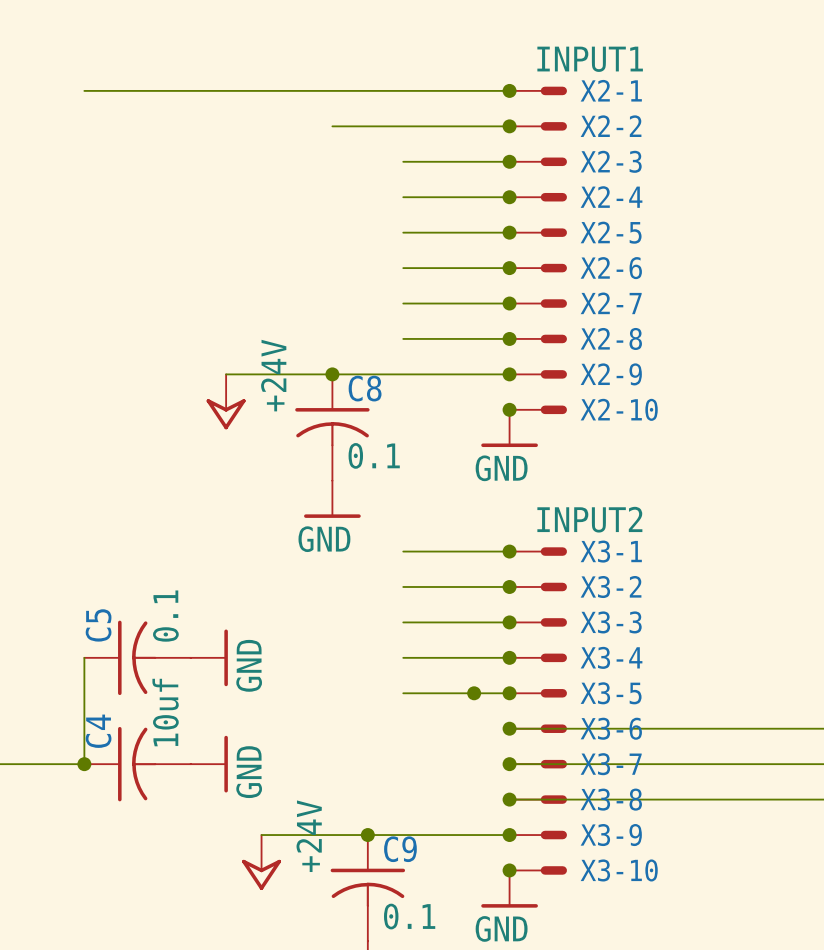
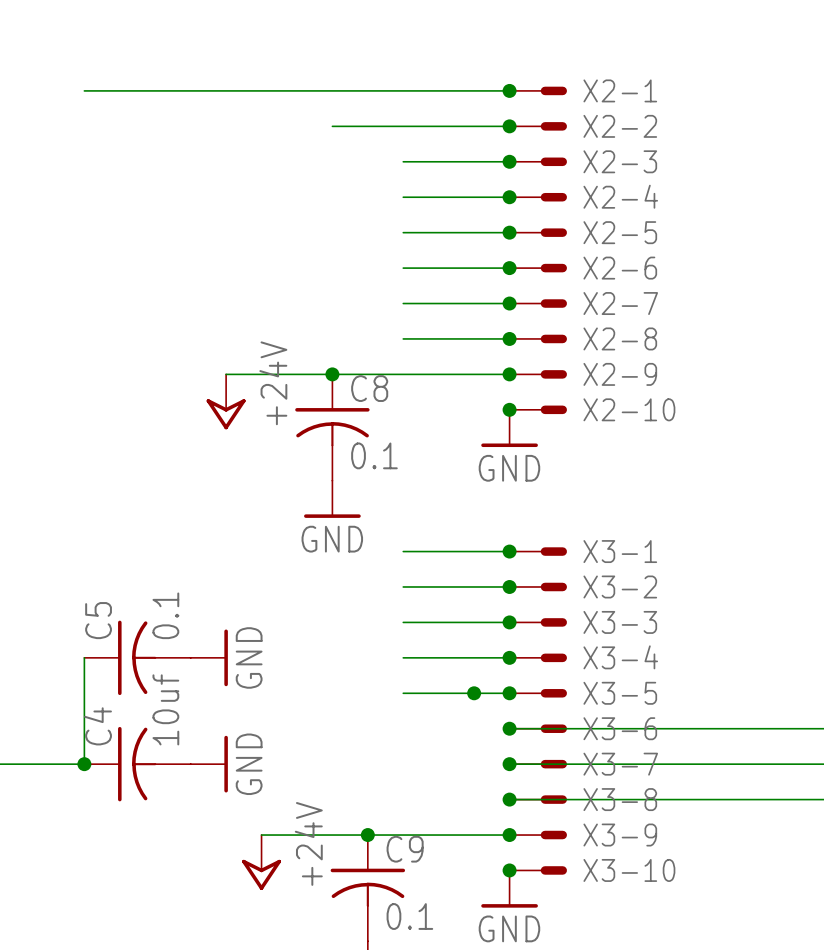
X2-1 value: INPUT1 (590, 59) -> none
X3-1 value: INPUT2 (589, 519) -> none

